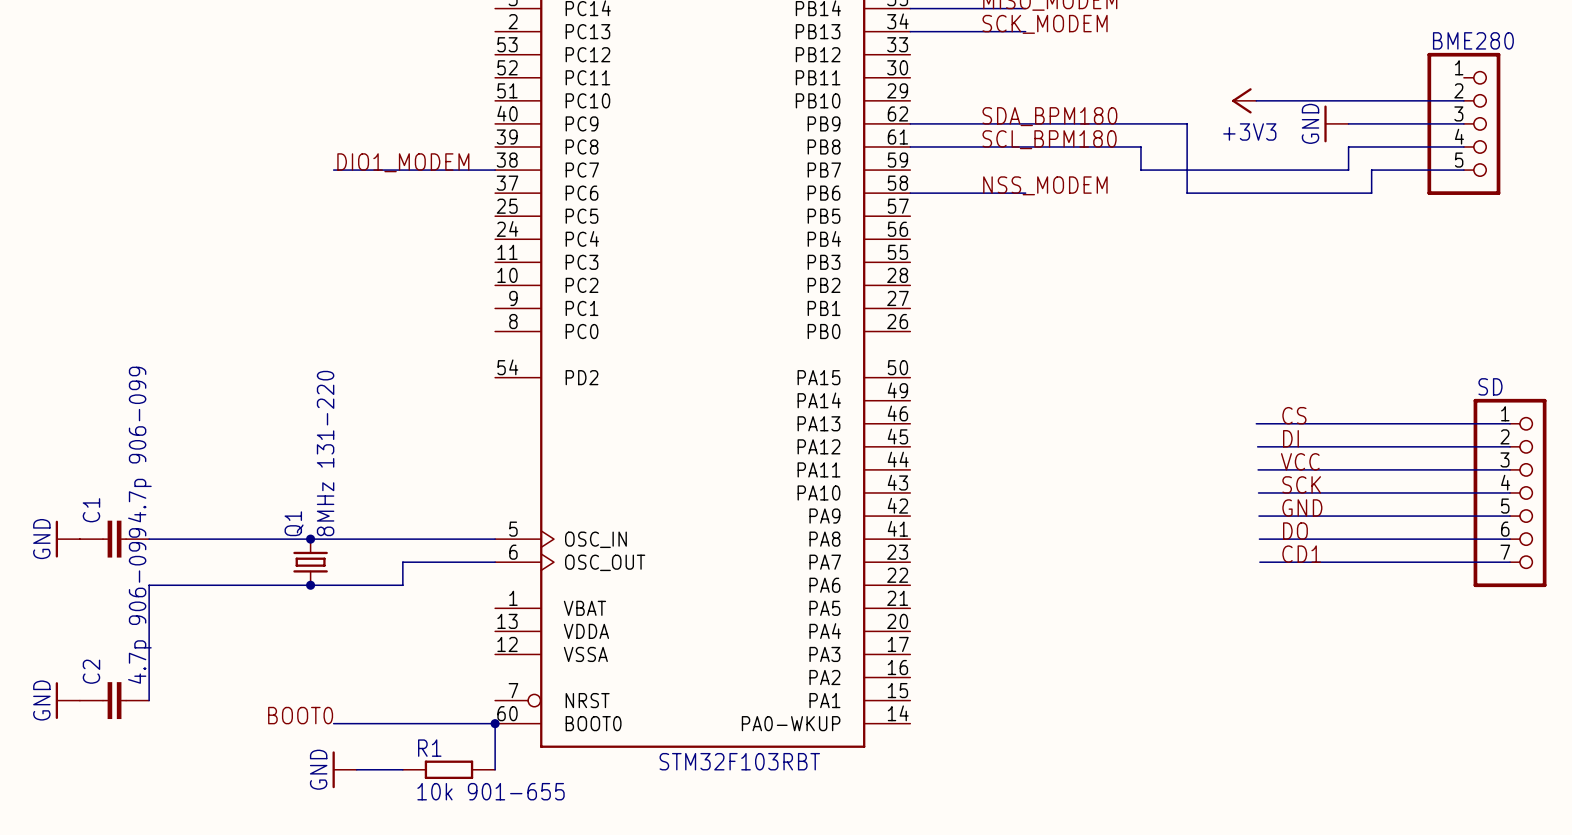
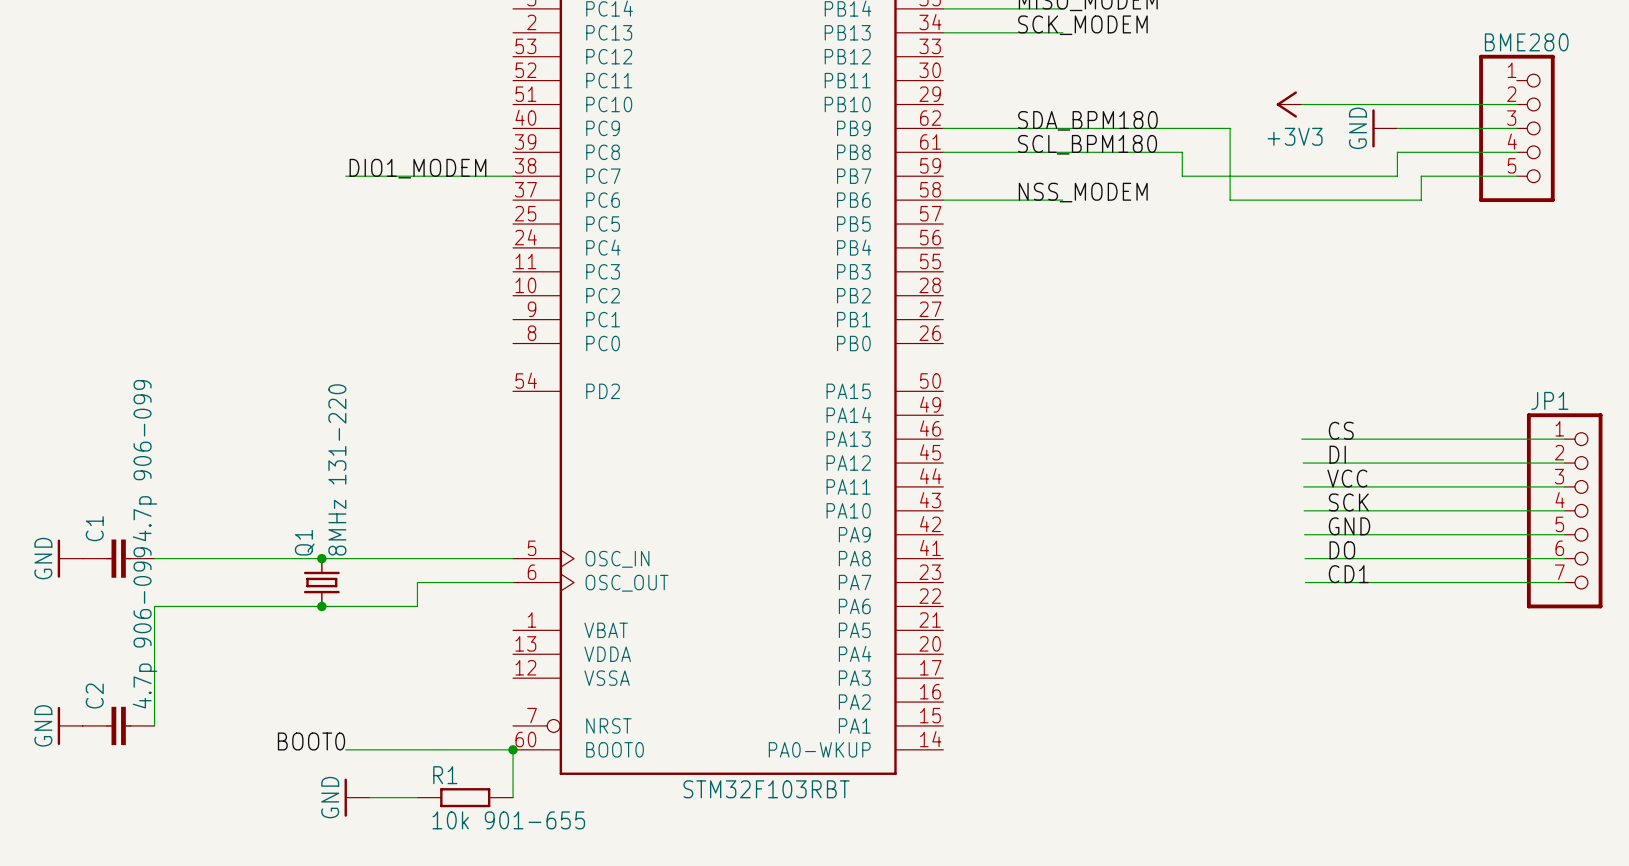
SD name: SD (1490, 386) -> JP1 (1549, 400)

